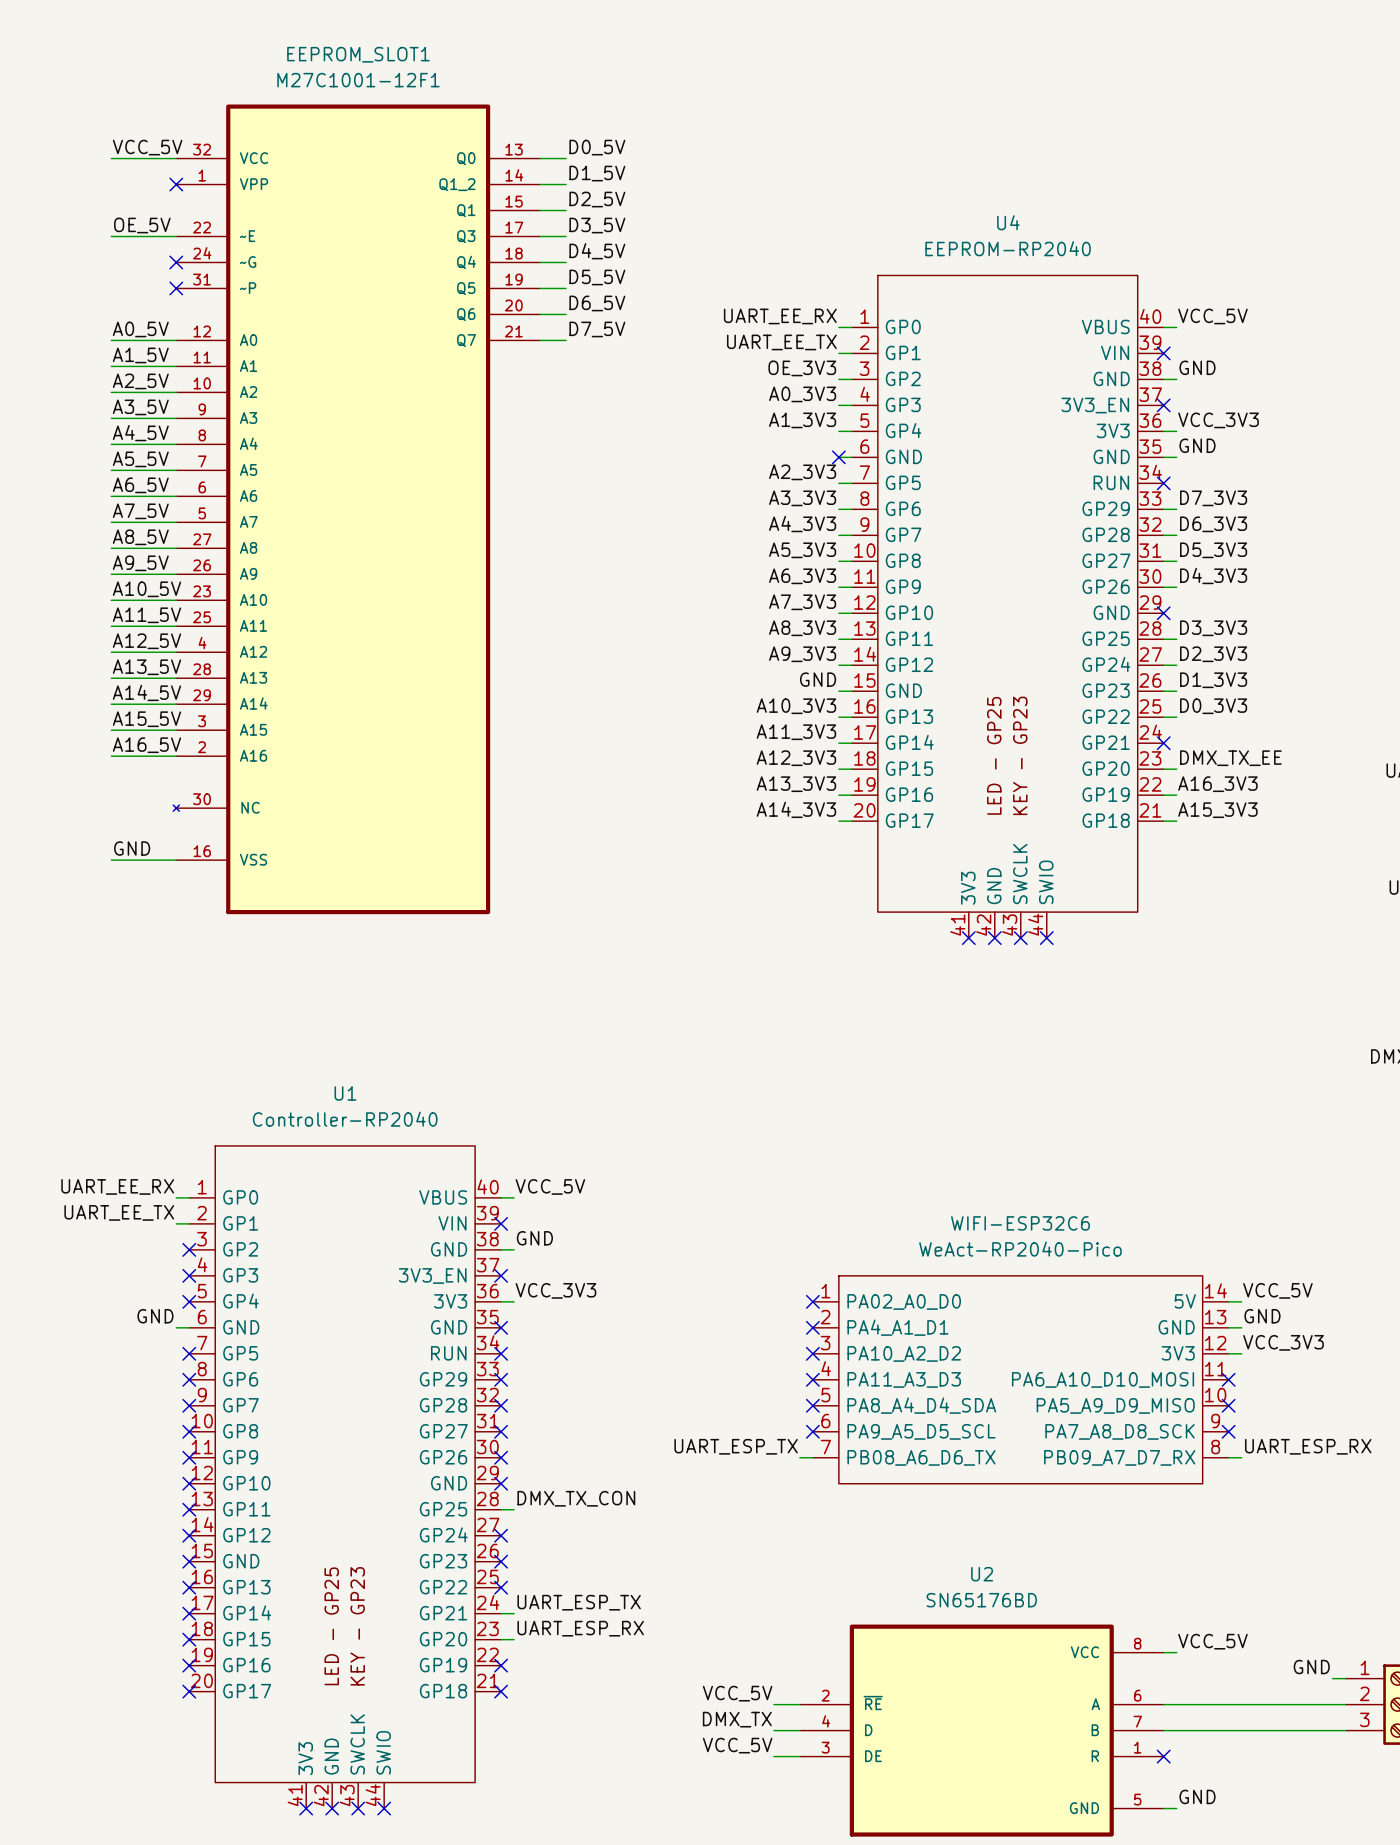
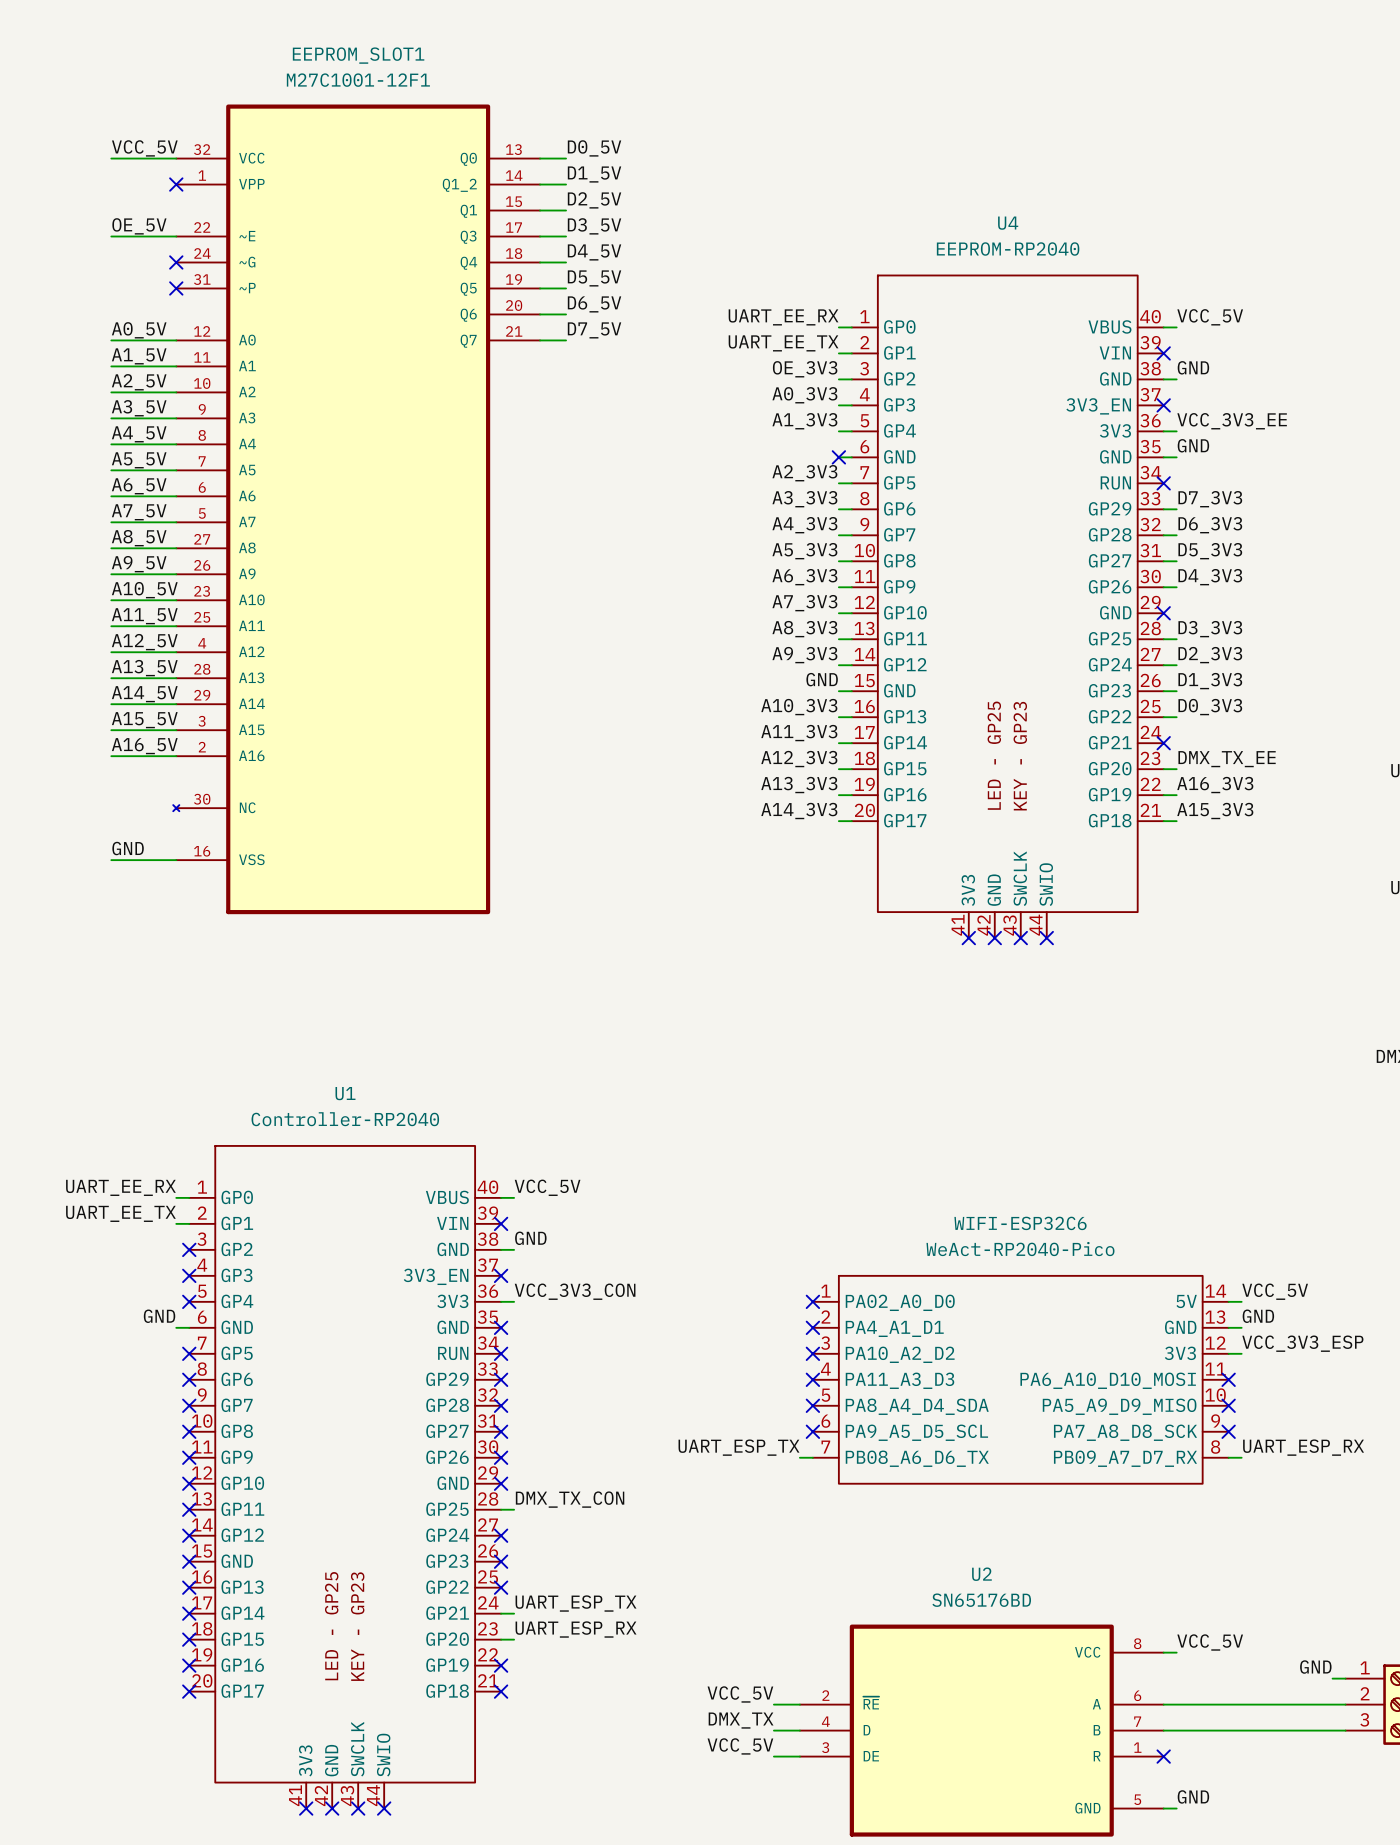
label: VCC_3V3 (1218, 420) -> VCC_3V3_EE (1232, 421)
label: VCC_3V3 (555, 1290) -> VCC_3V3_CON (575, 1291)
label: VCC_3V3 (1283, 1342) -> VCC_3V3_ESP (1302, 1343)

